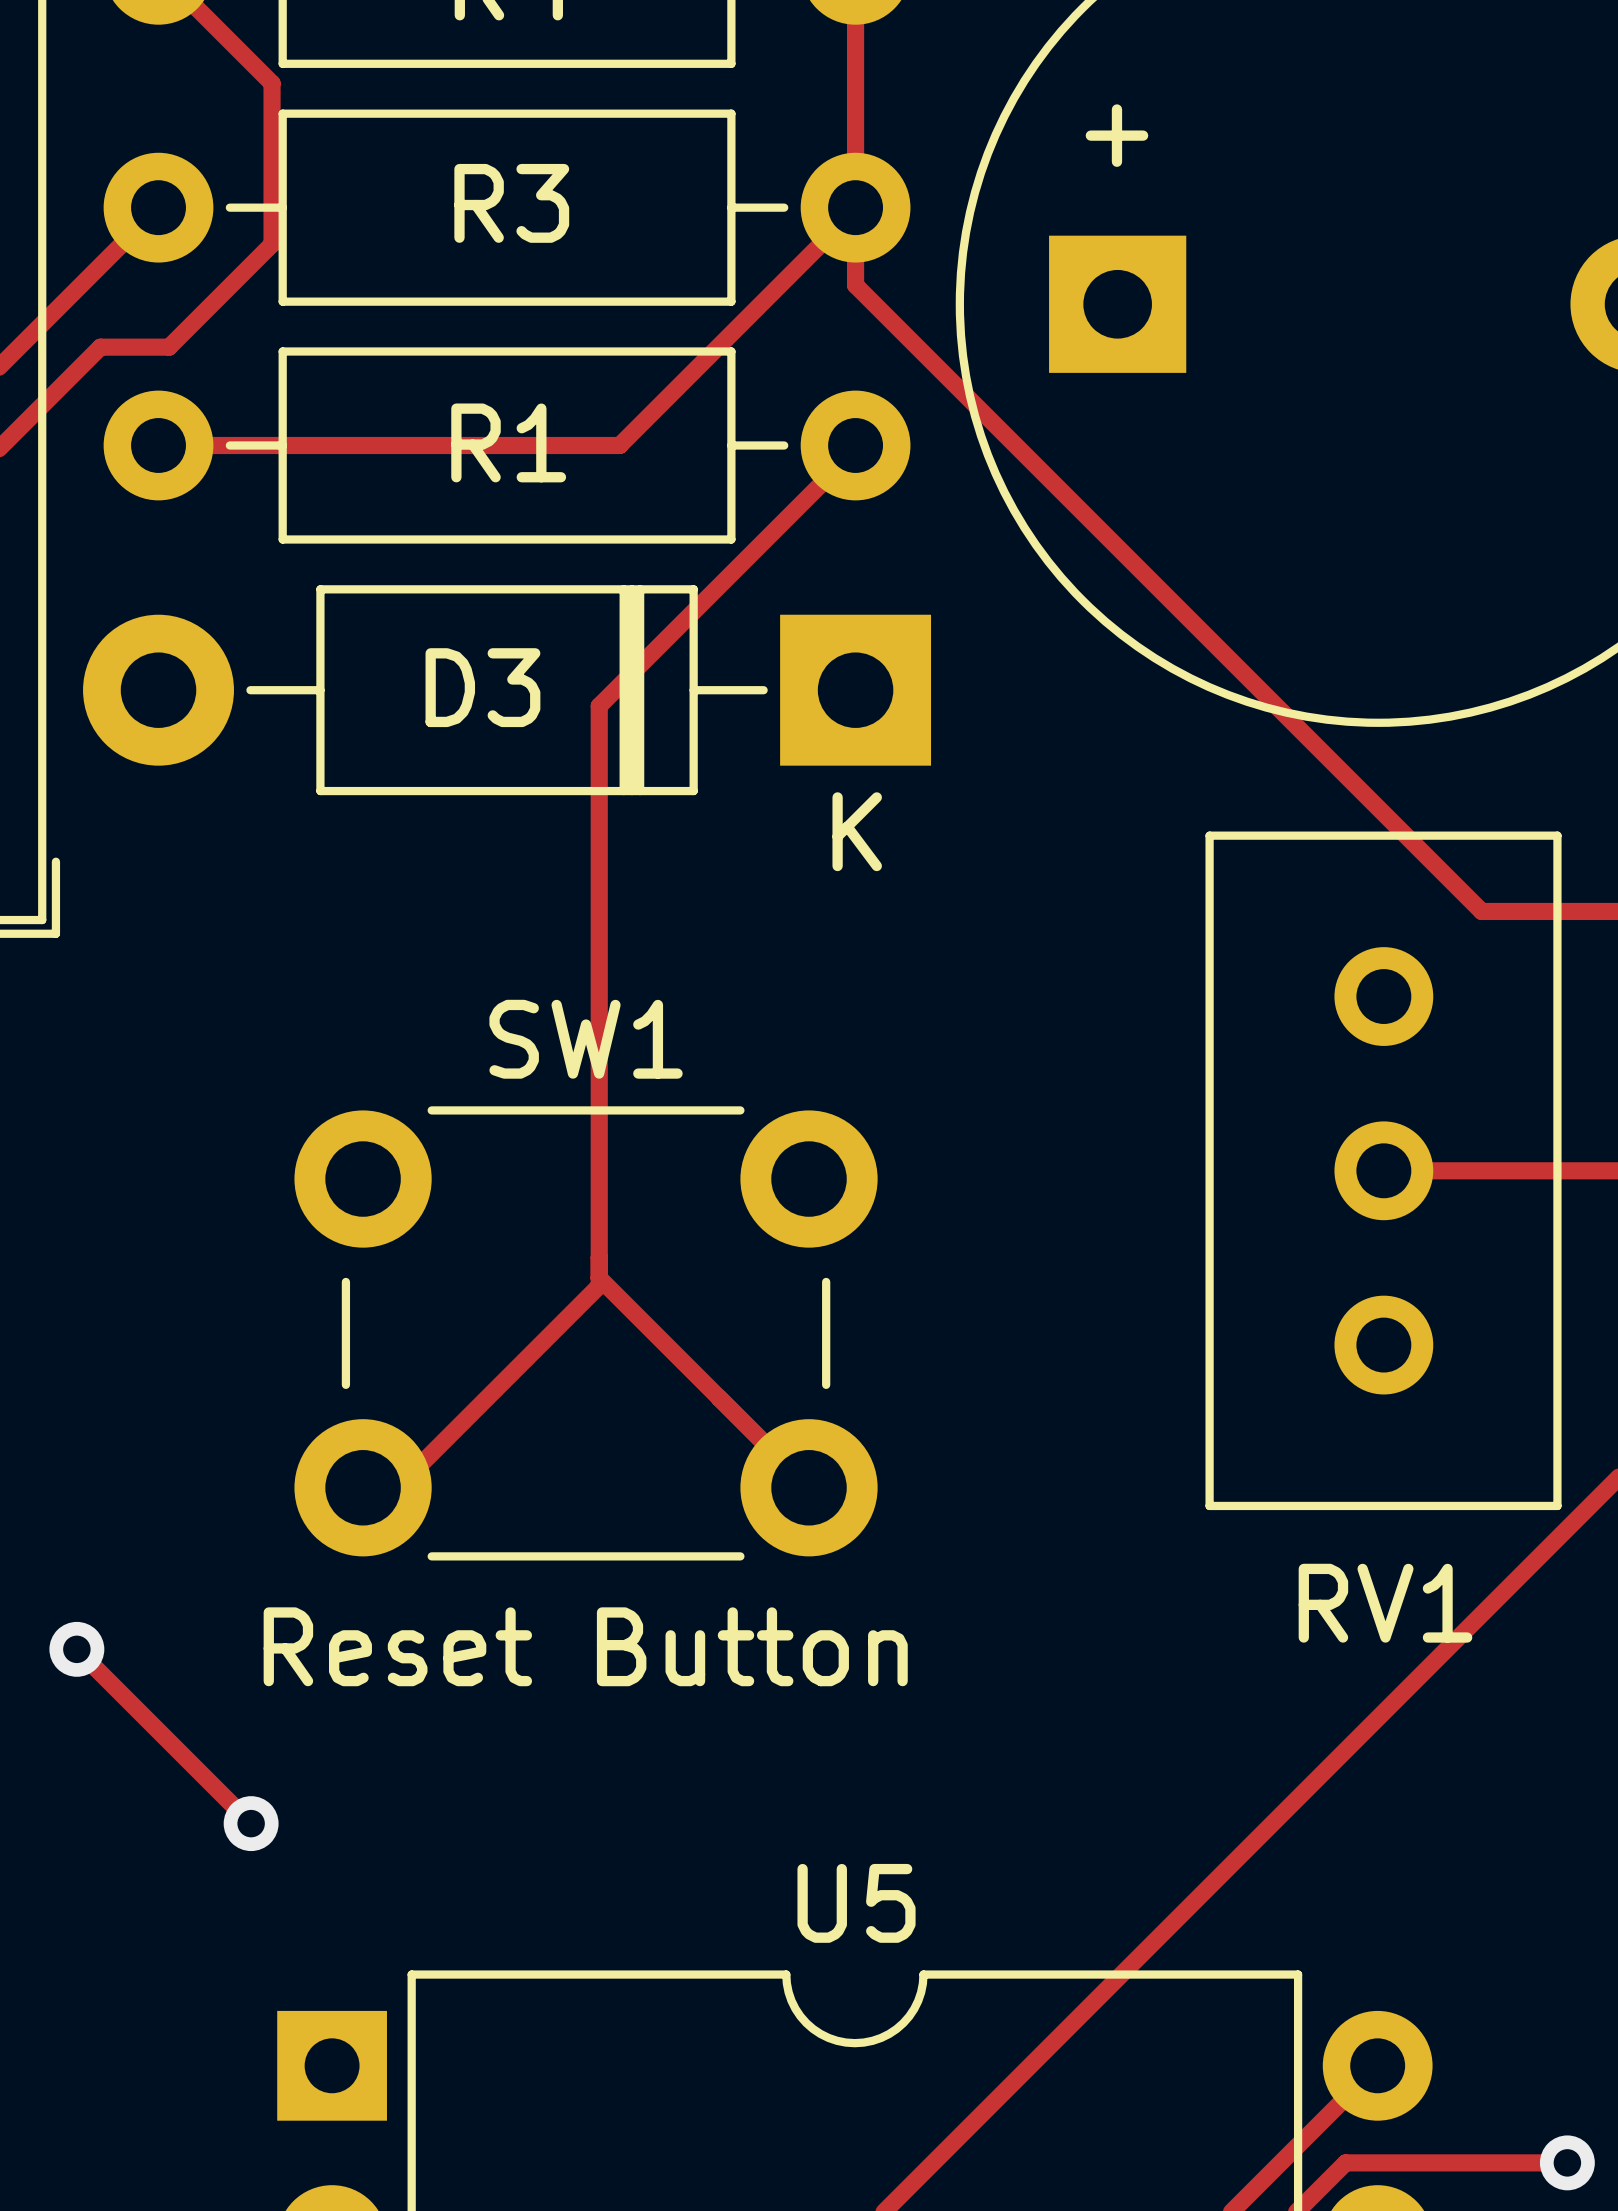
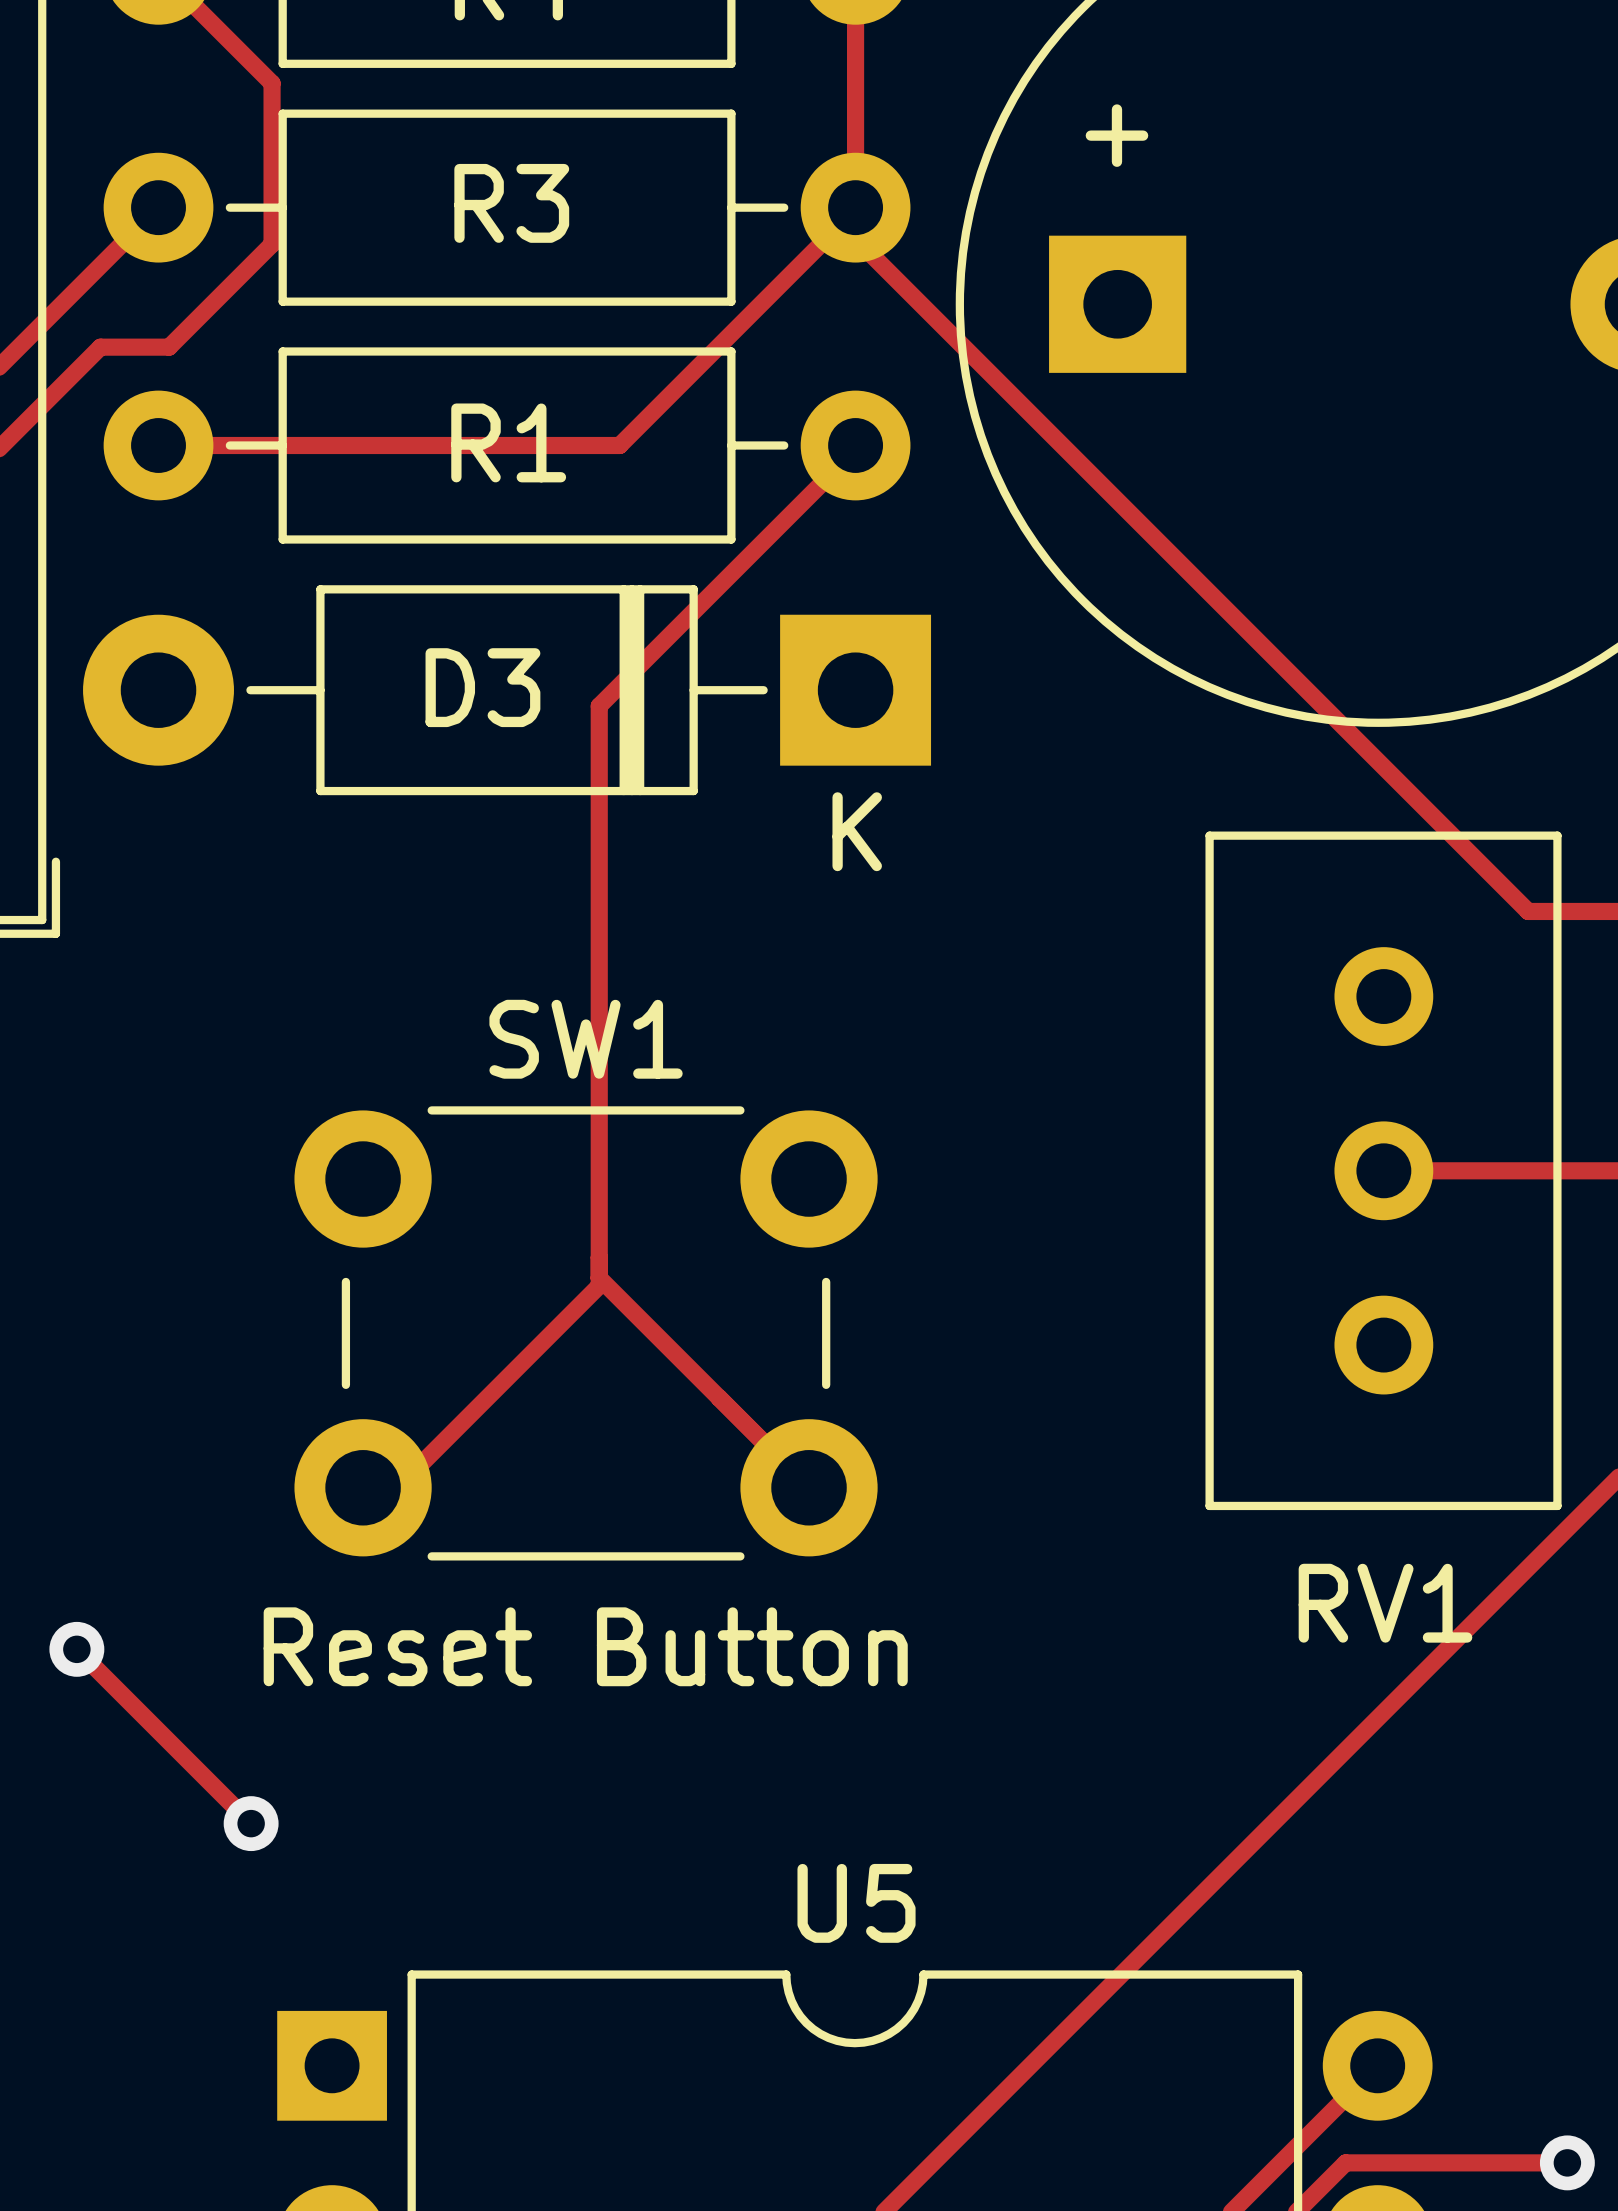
track: (855, 238) (855, 285) (1481, 911) (1528, 911) -> (855, 238) (1528, 911)

